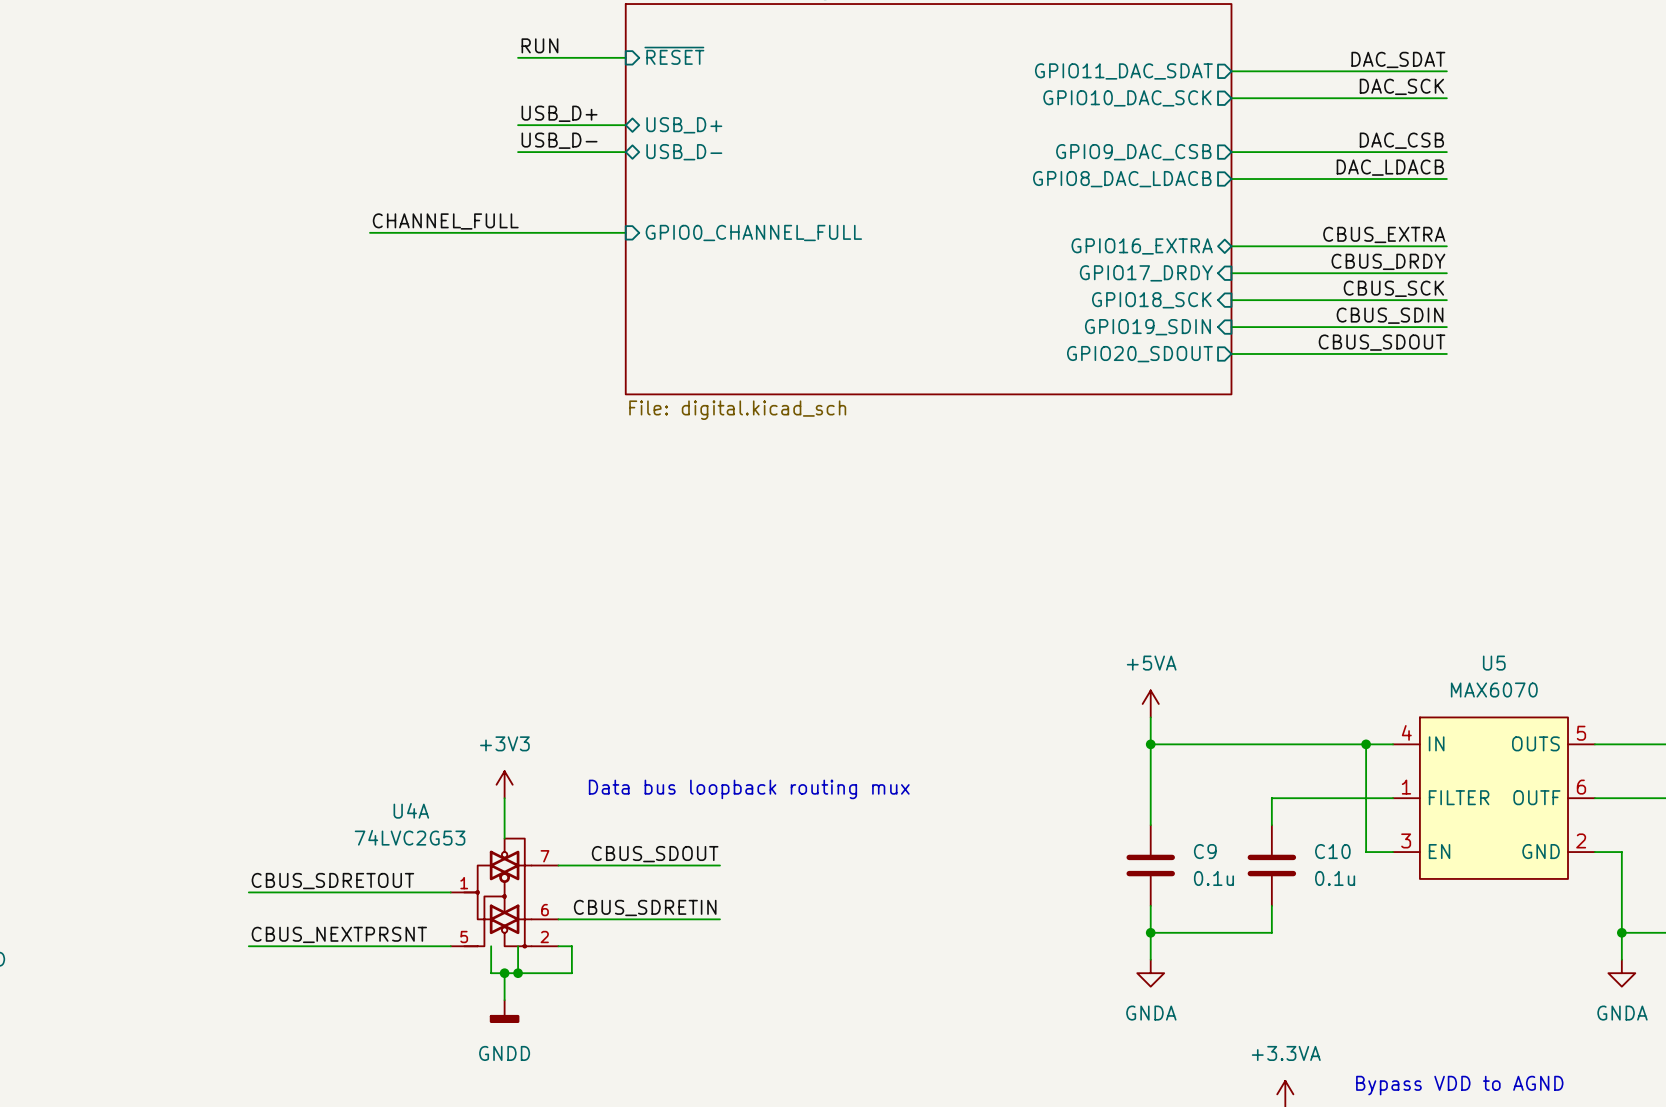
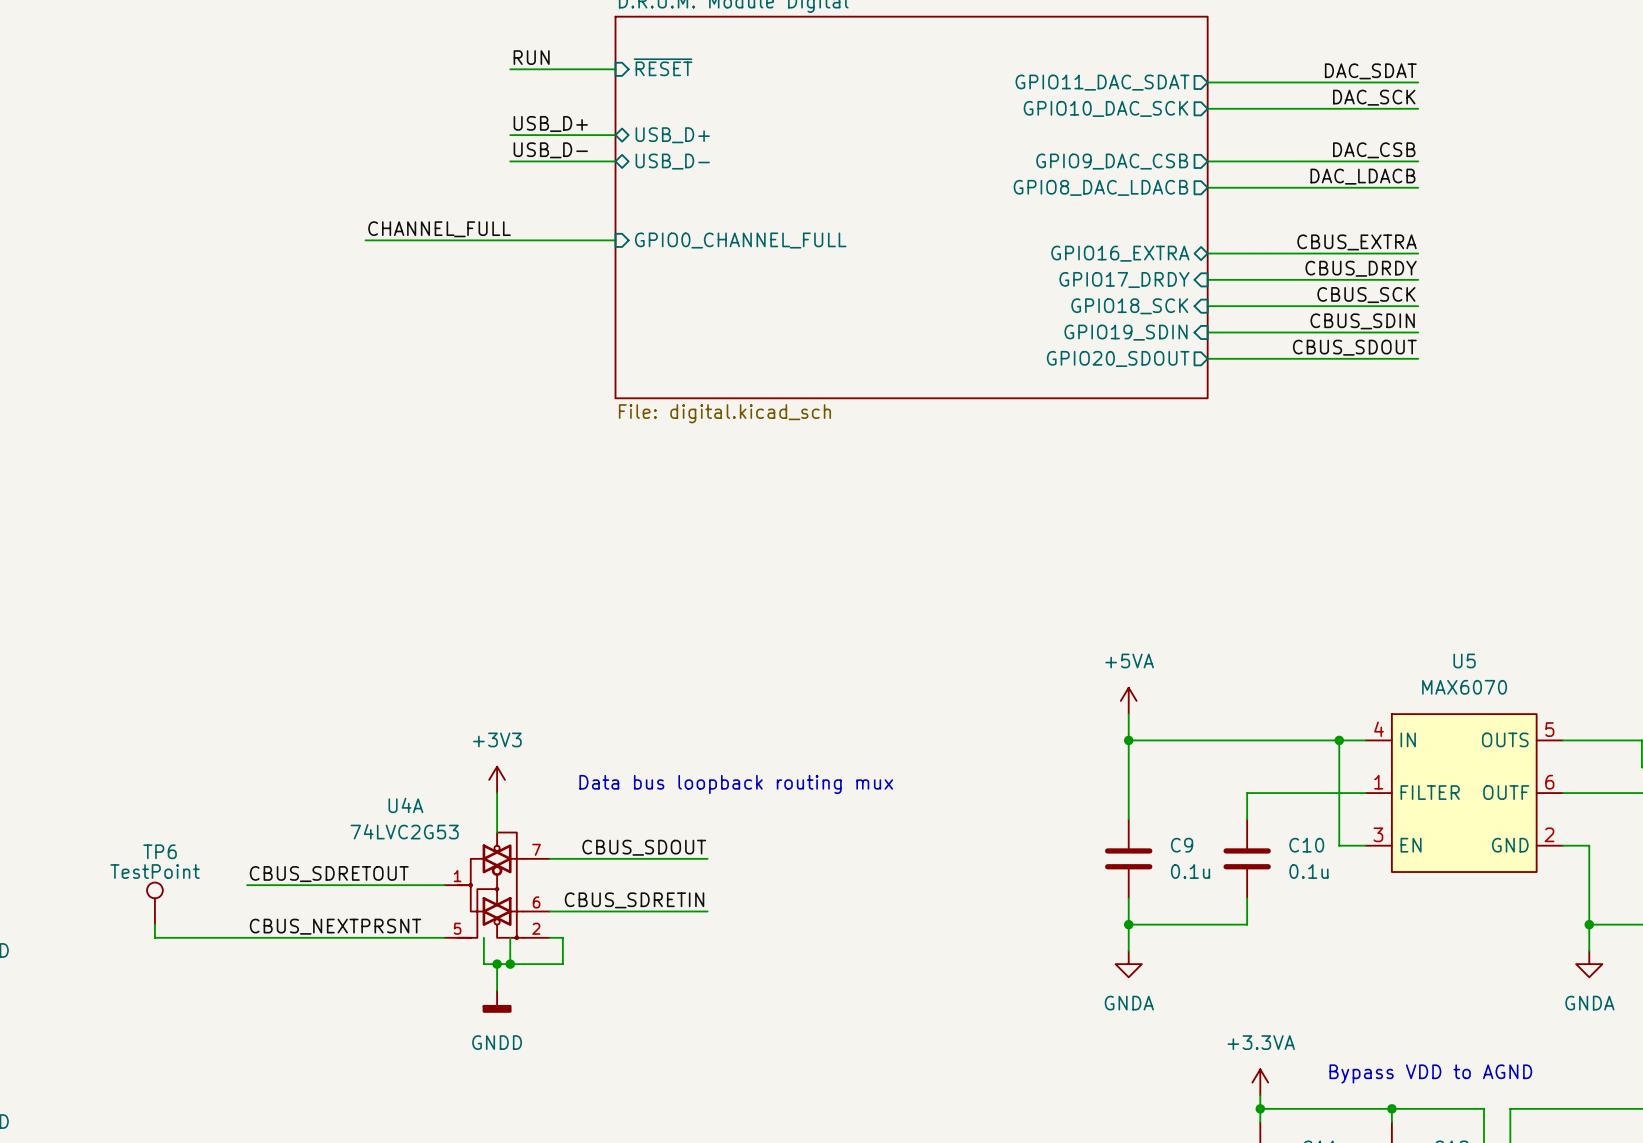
TP6: none -> TestPoint (154, 903)
wire: none -> (154, 924) (154, 937) (247, 937)

